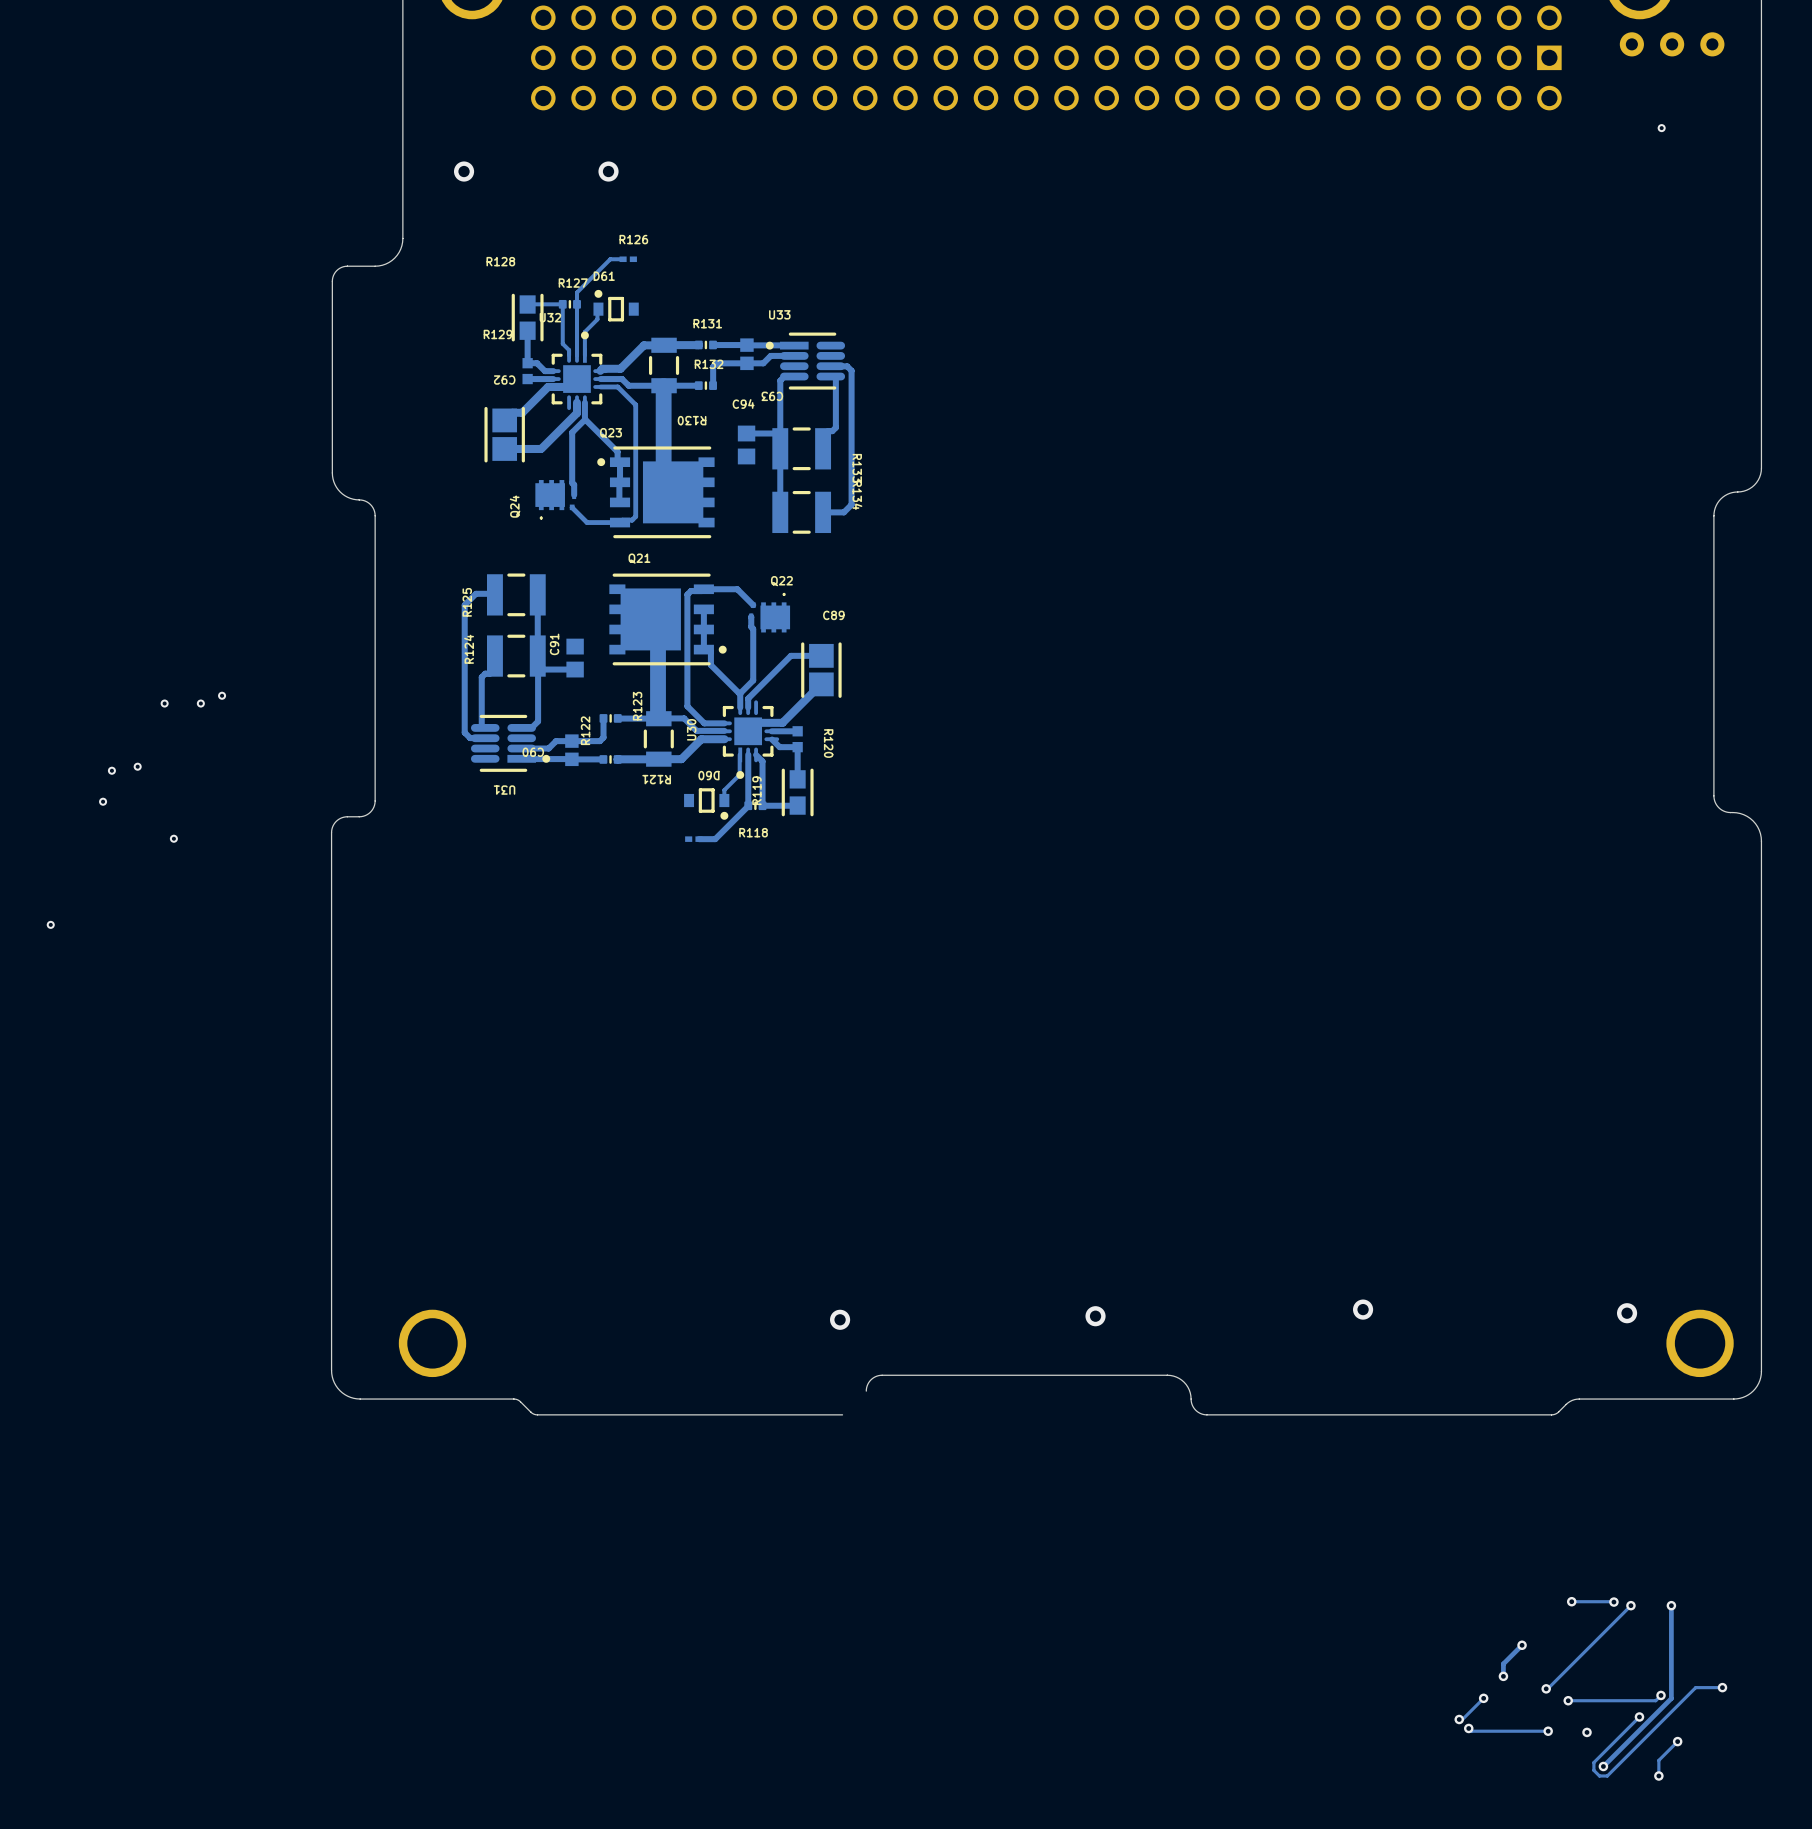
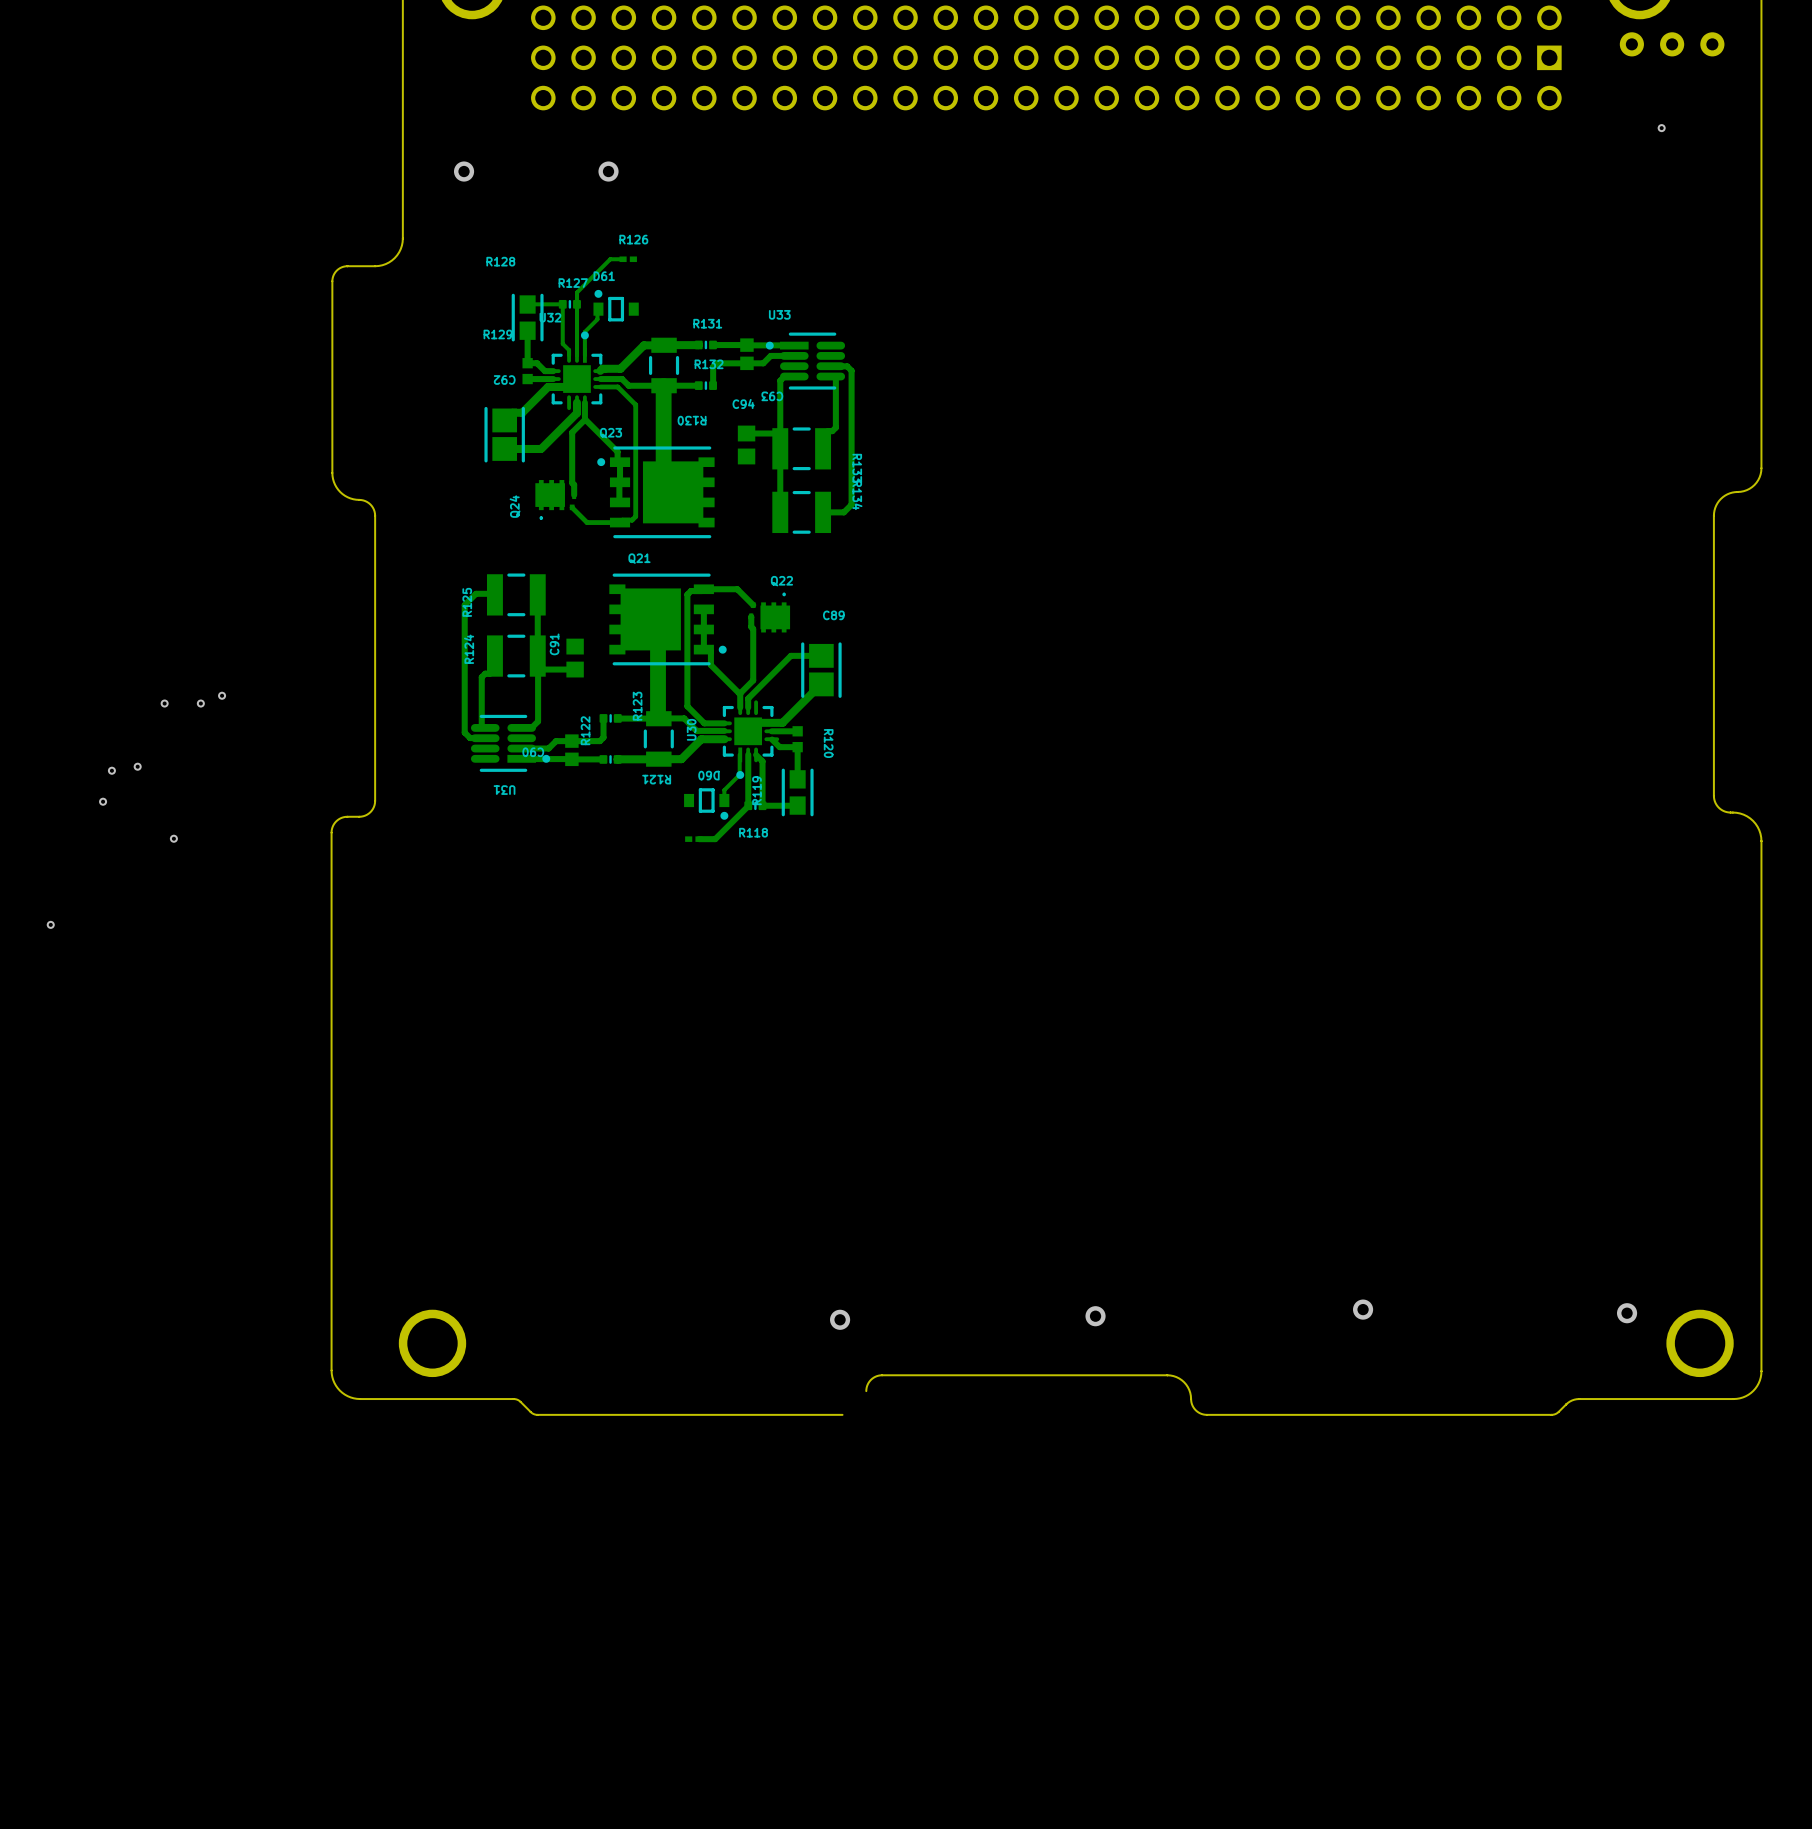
track: (1571, 1601) (1613, 1602) -> none
via: (1571, 1601) -> none
via: (1613, 1602) -> none
track: (1630, 1605) (1546, 1688) -> none
via: (1630, 1605) -> none
track: (1671, 1605) (1671, 1698) (1603, 1766) -> none
via: (1671, 1605) -> none
track: (1522, 1645) (1503, 1663) (1503, 1676) -> none
via: (1522, 1645) -> none
via: (1503, 1676) -> none
track: (1722, 1687) (1695, 1687) (1607, 1775) (1599, 1775) (1593, 1770) (1593, 1762) (1639, 1716) -> none
via: (1722, 1687) -> none
via: (1546, 1688) -> none
track: (1661, 1695) (1655, 1700) (1568, 1700) -> none
via: (1661, 1695) -> none
track: (1483, 1698) (1462, 1719) (1459, 1719) -> none
via: (1483, 1698) -> none
via: (1568, 1700) -> none
via: (1639, 1716) -> none
via: (1459, 1719) -> none
track: (1468, 1728) (1471, 1731) (1548, 1731) -> none
via: (1468, 1728) -> none
via: (1548, 1731) -> none
via: (1587, 1732) -> none
track: (1677, 1741) (1658, 1760) (1658, 1775) -> none
via: (1677, 1741) -> none
via: (1603, 1766) -> none
via: (1658, 1775) -> none

